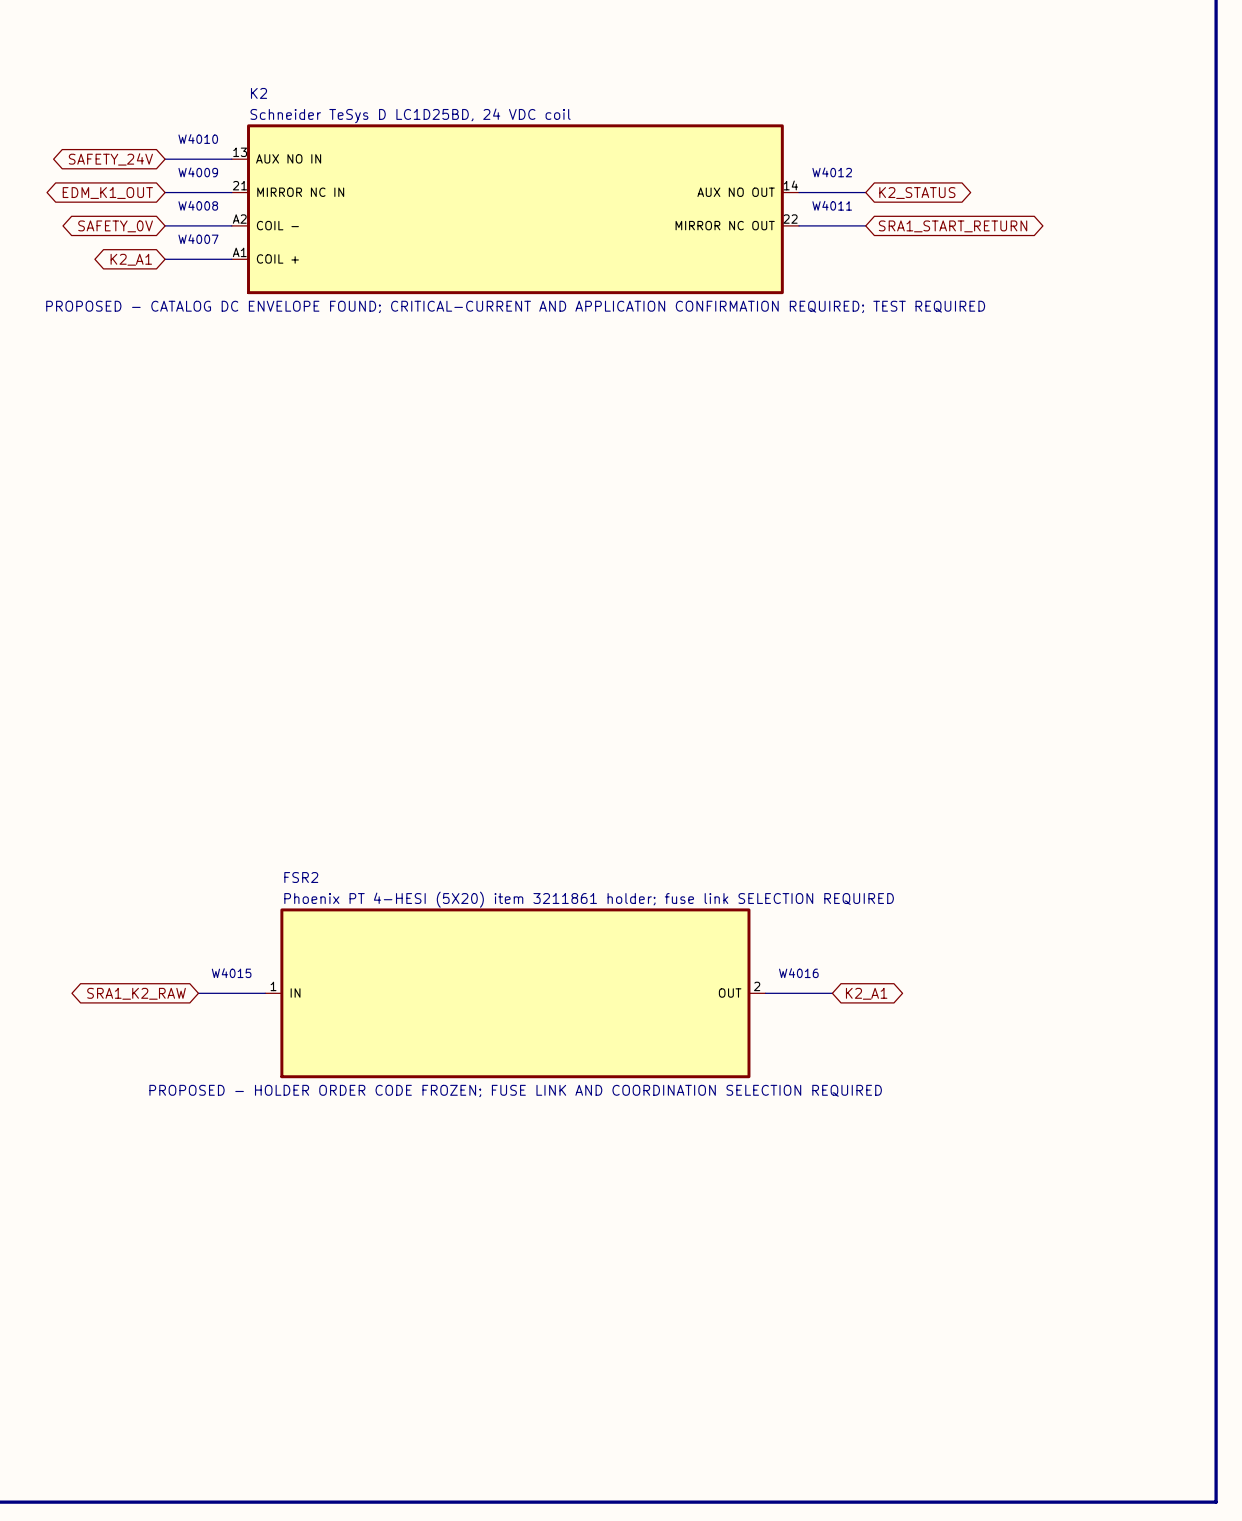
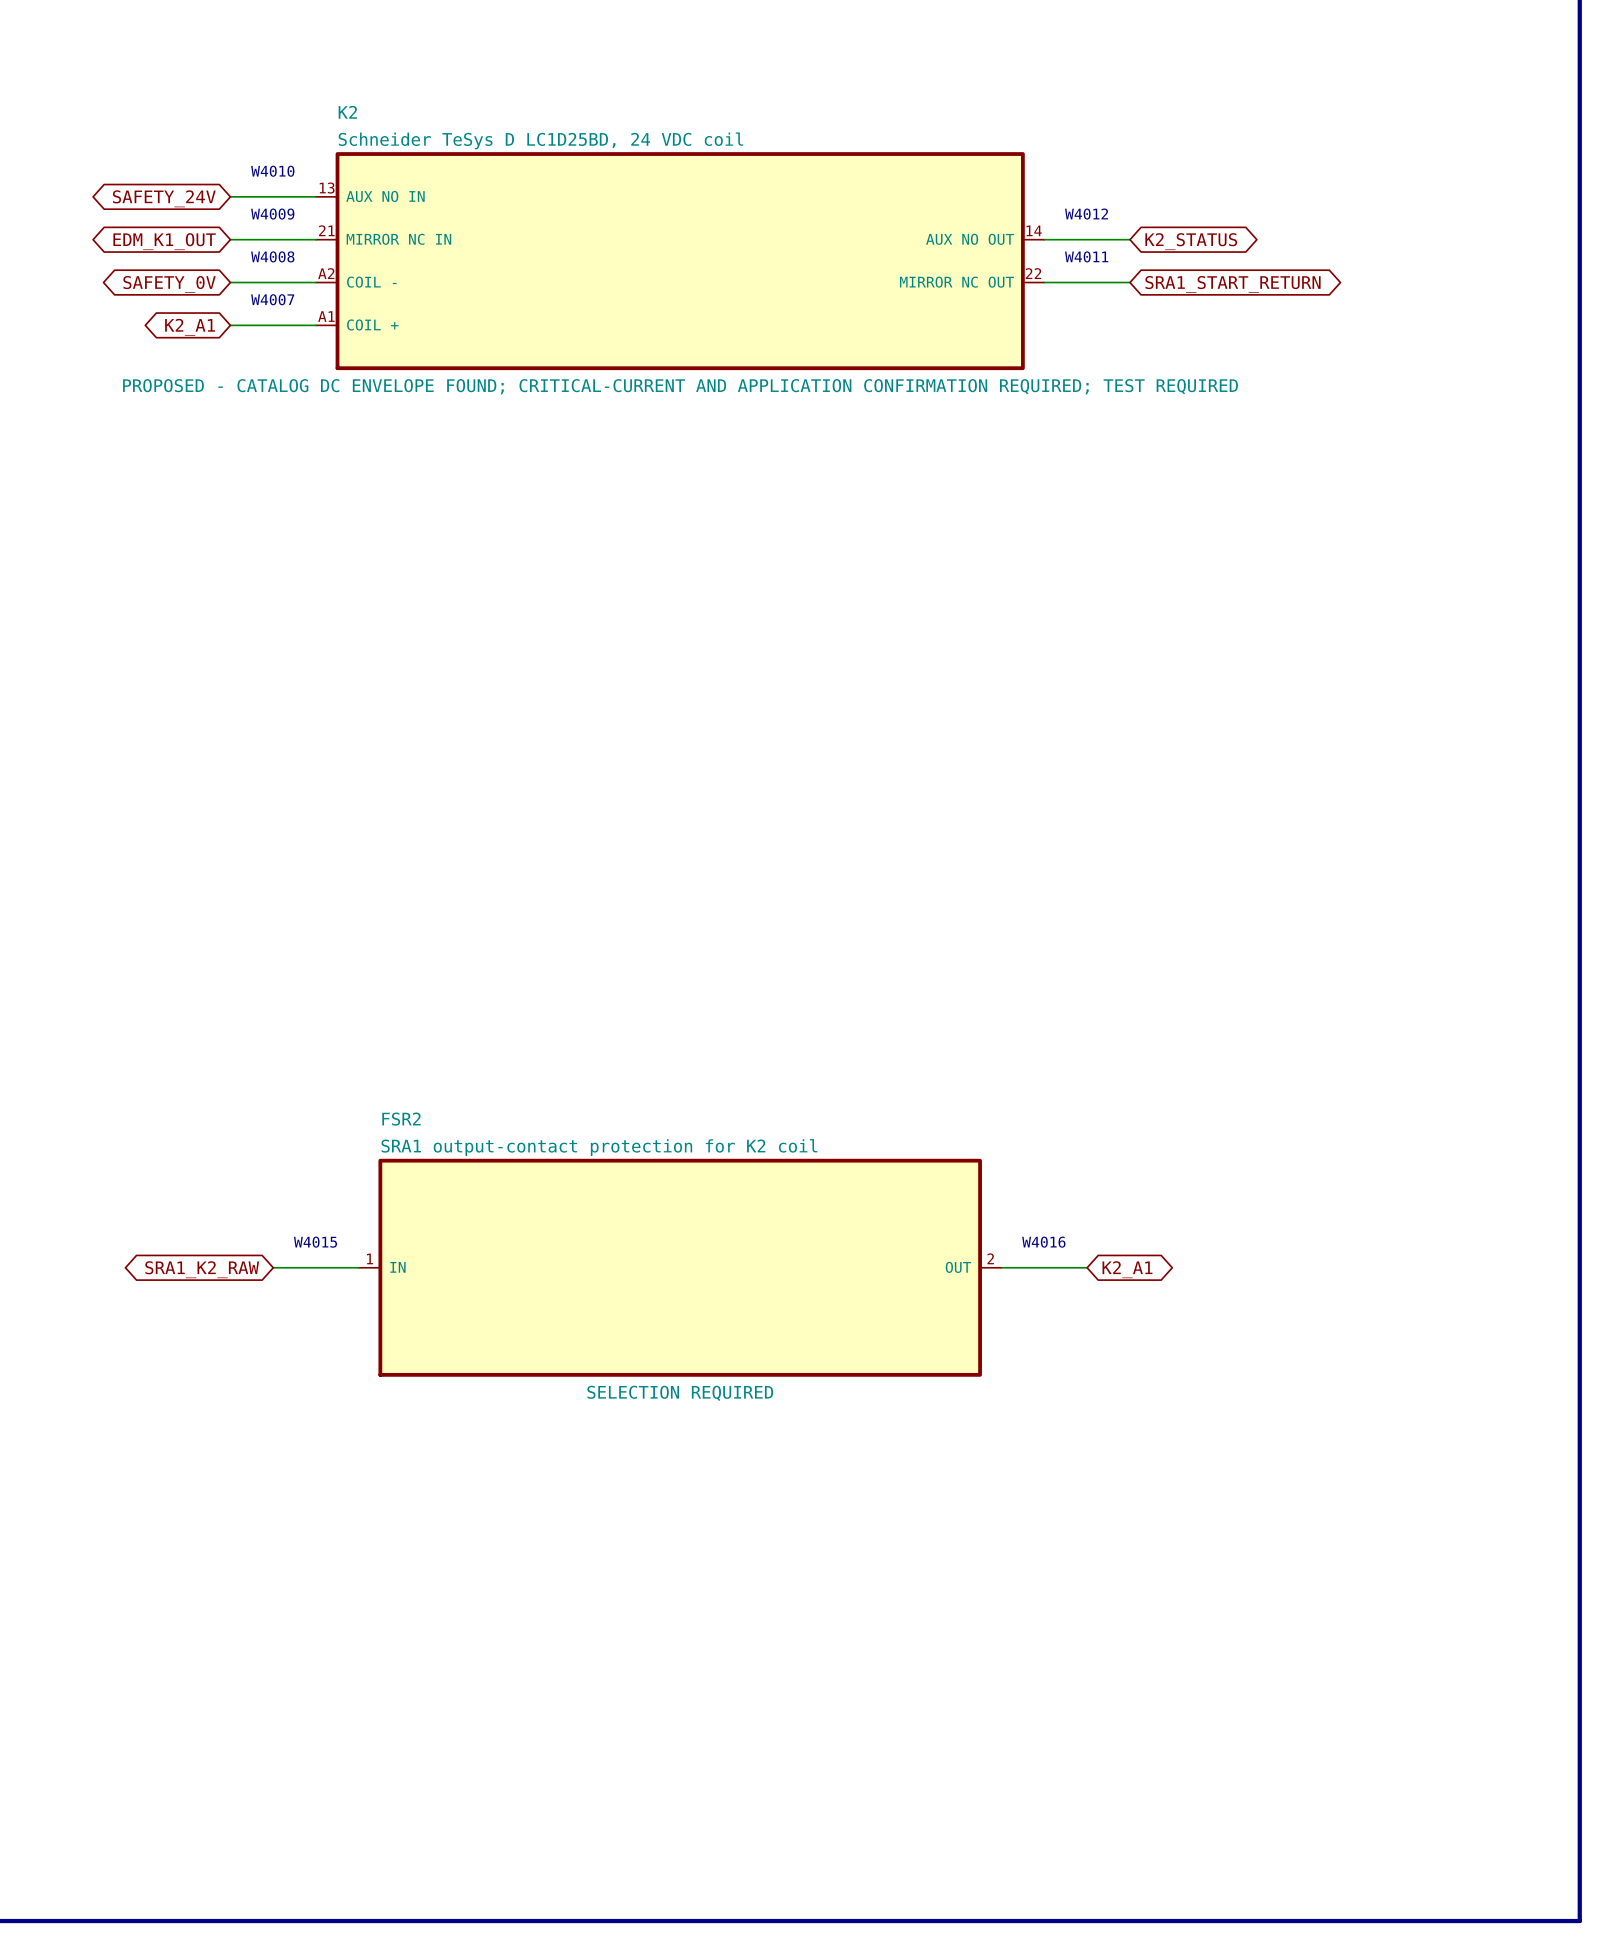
FSR2 text: Phoenix PT 4-HESI (5X20) item 3211861 holder; fuse link SELECTION REQUIRED (589, 899) -> SRA1 output-contact protection for K2 coil (599, 1147)
FSR2 text: PROPOSED - HOLDER ORDER CODE FROZEN; FUSE LINK AND COORDINATION SELECTION REQUIRED (515, 1091) -> SELECTION REQUIRED (680, 1393)

